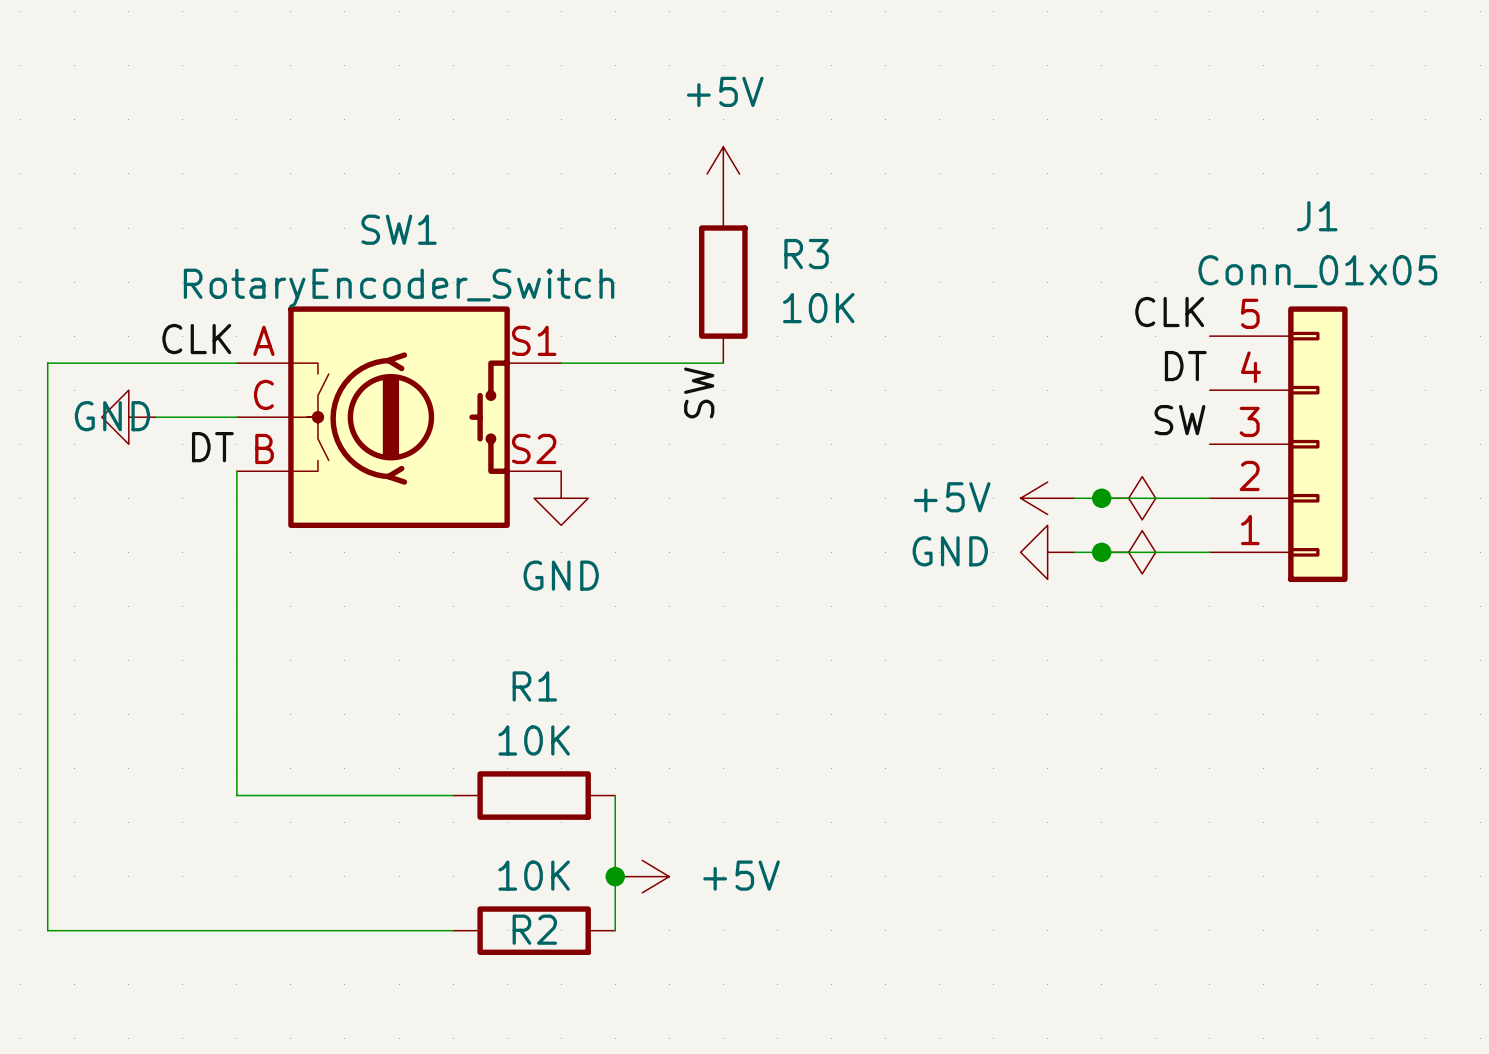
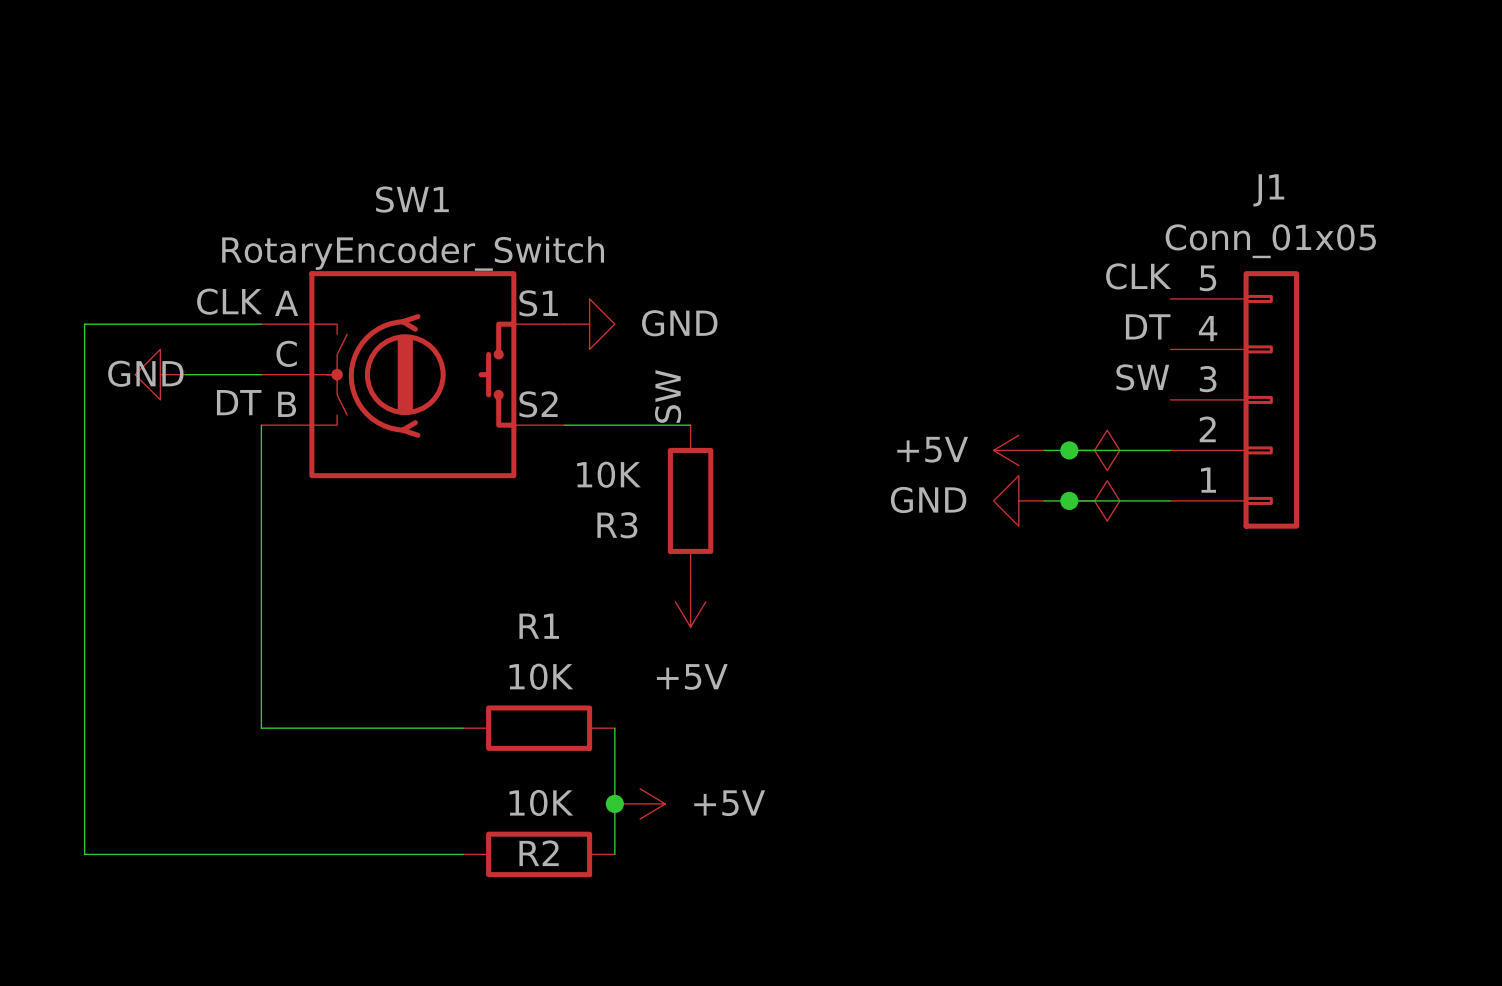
power symbol rotation: 0° (723, 173) -> 180° (690, 601)
power symbol position: +5V (723, 173) -> +5V (690, 601)
R3 name position: R3 (806, 254) -> R3 (617, 525)
R3 position: (723, 282) -> (690, 500)
R3 value position: 10K (818, 308) -> 10K (608, 474)
wire: (561, 363) (723, 363) -> none
label position: SW (699, 392) -> SW (668, 396)
wire: none -> (564, 425) (690, 425)
power symbol rotation: 0° (561, 498) -> 90° counterclockwise (589, 324)
power symbol position: GND (561, 498) -> GND (589, 324)

